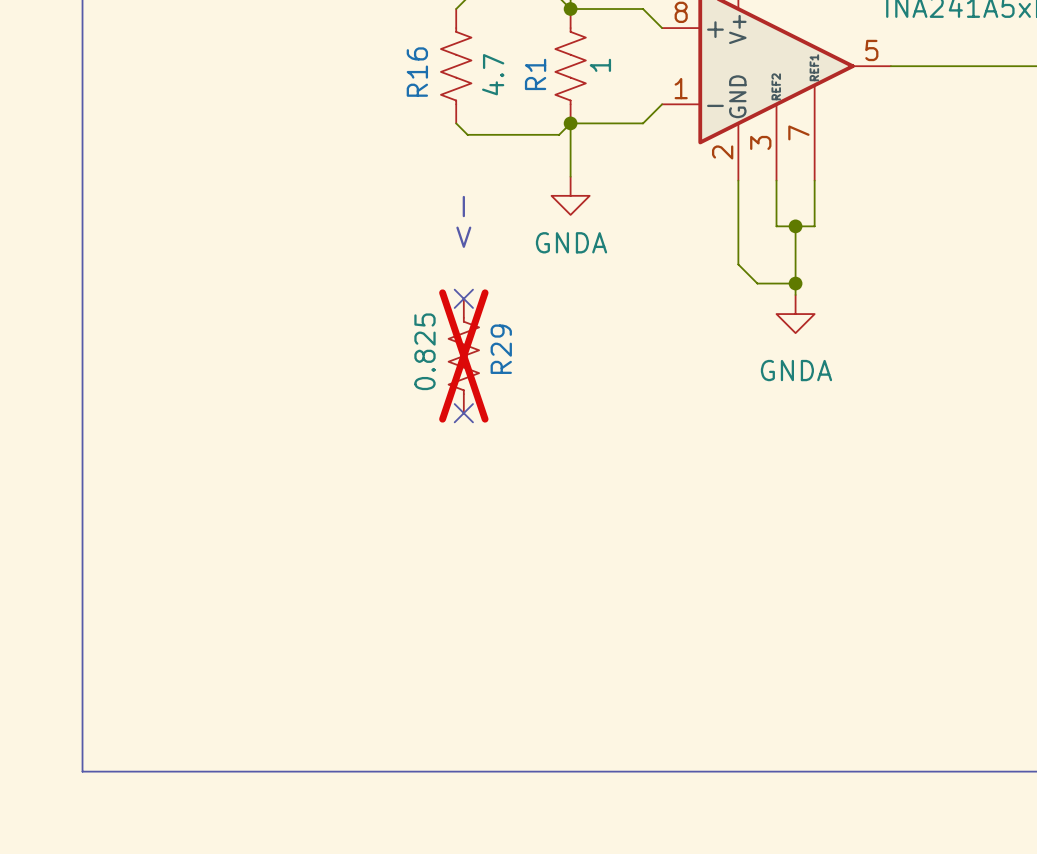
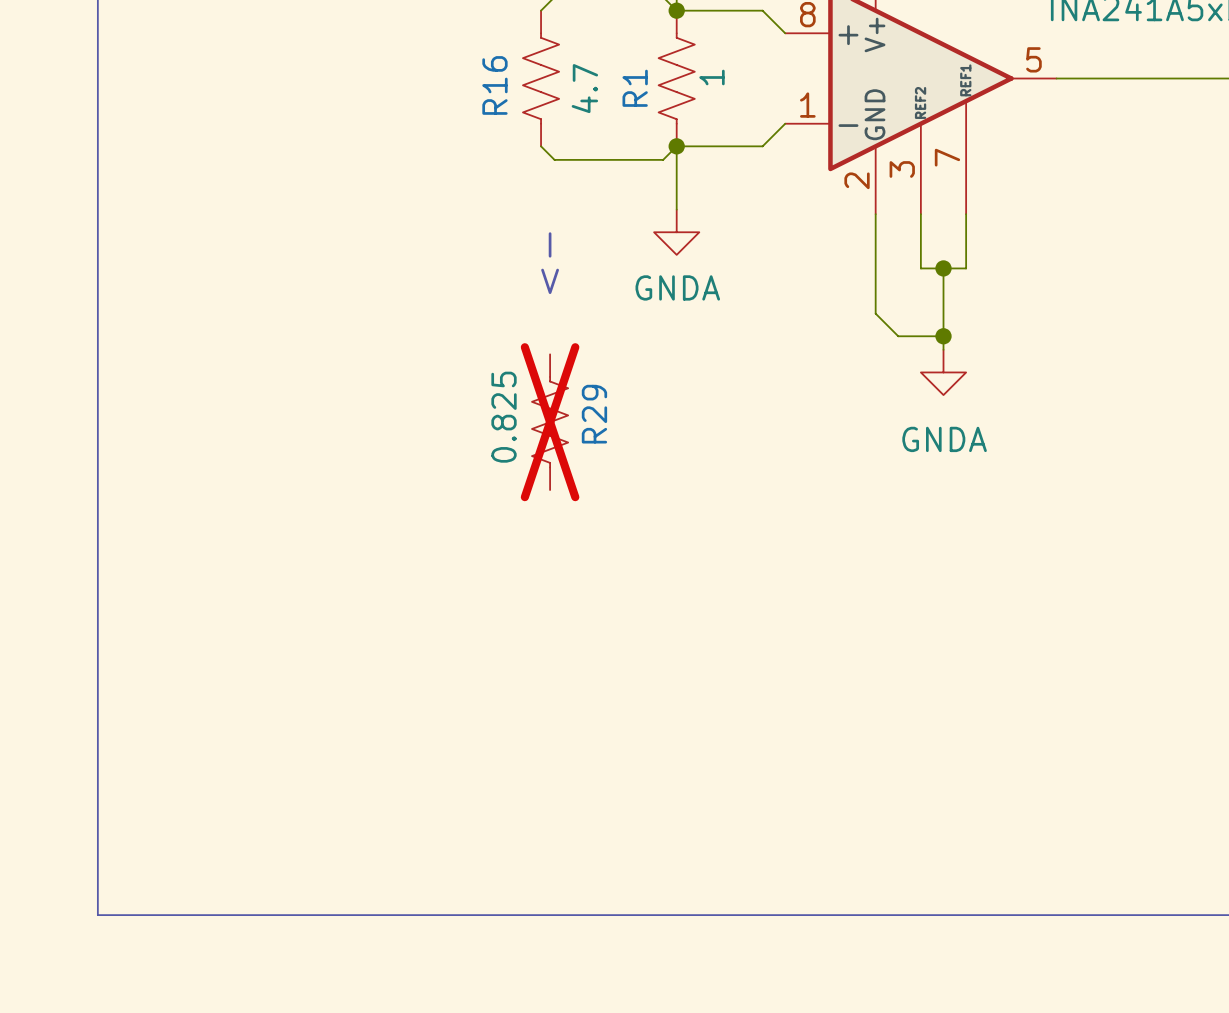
no-connect mark: (463, 298) -> none
no-connect mark: (463, 413) -> none

